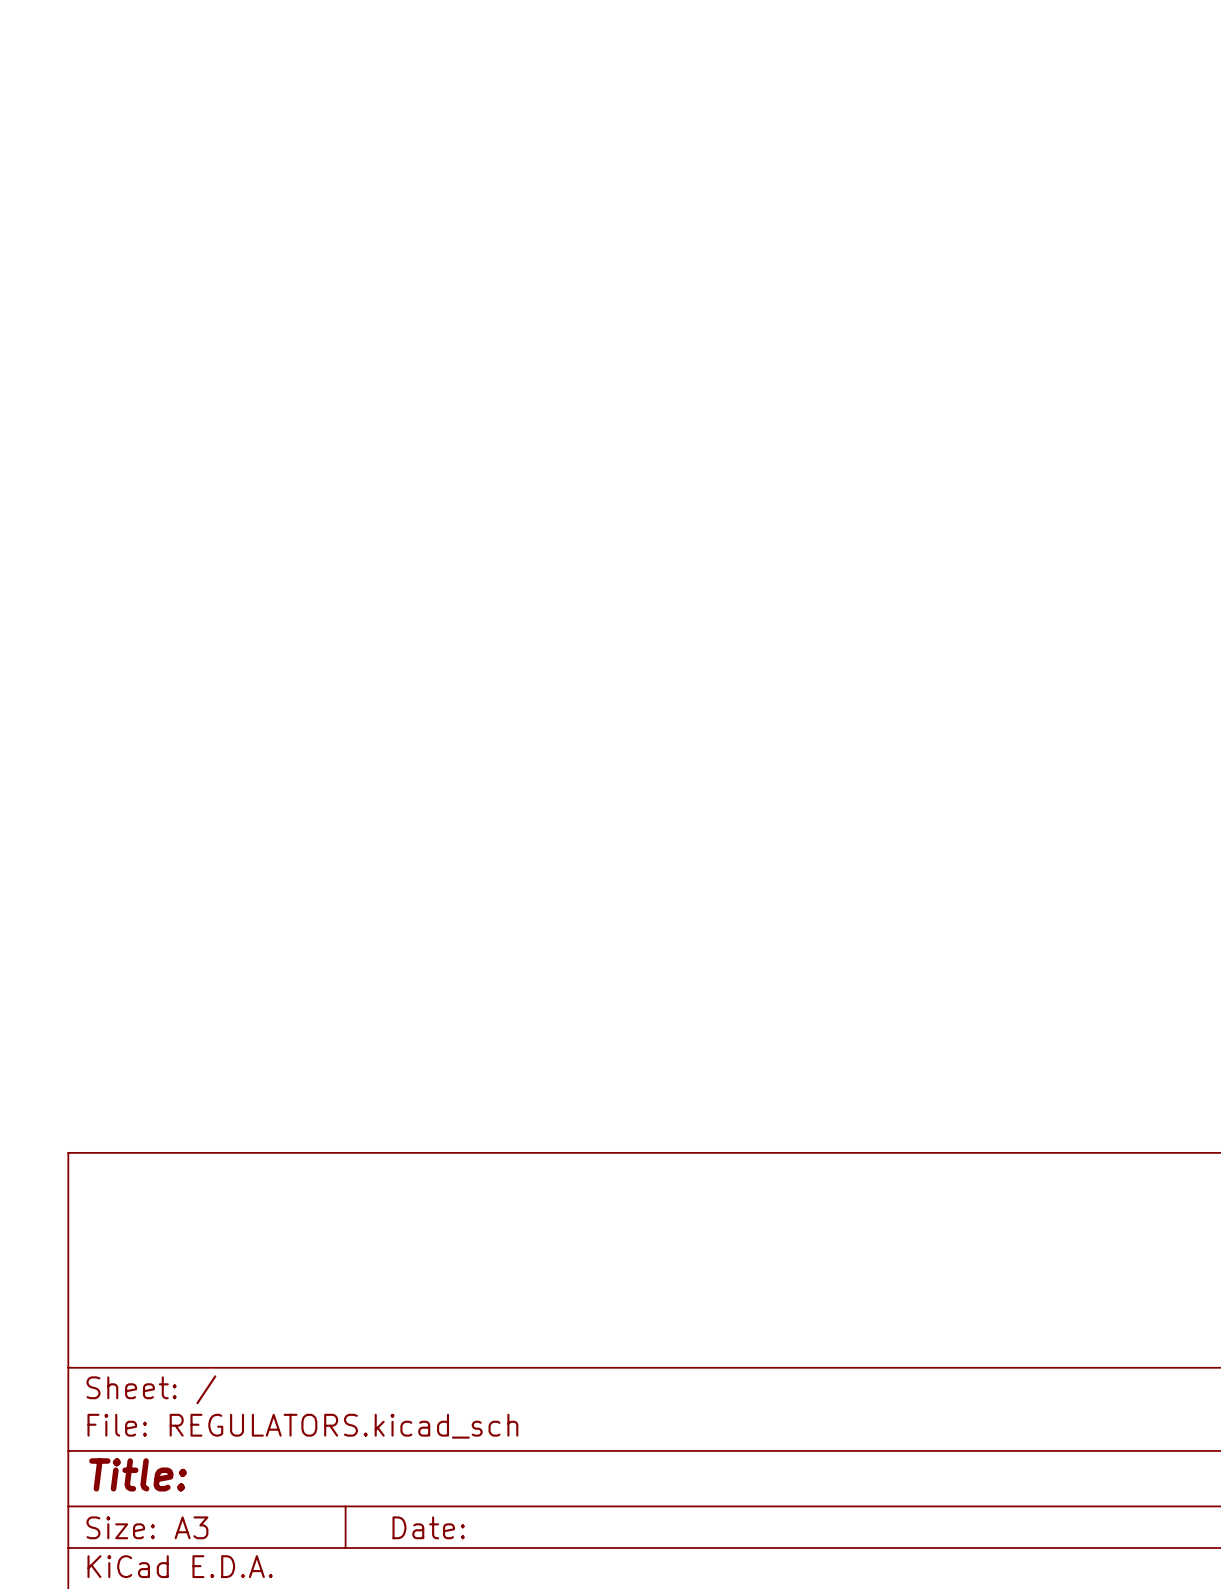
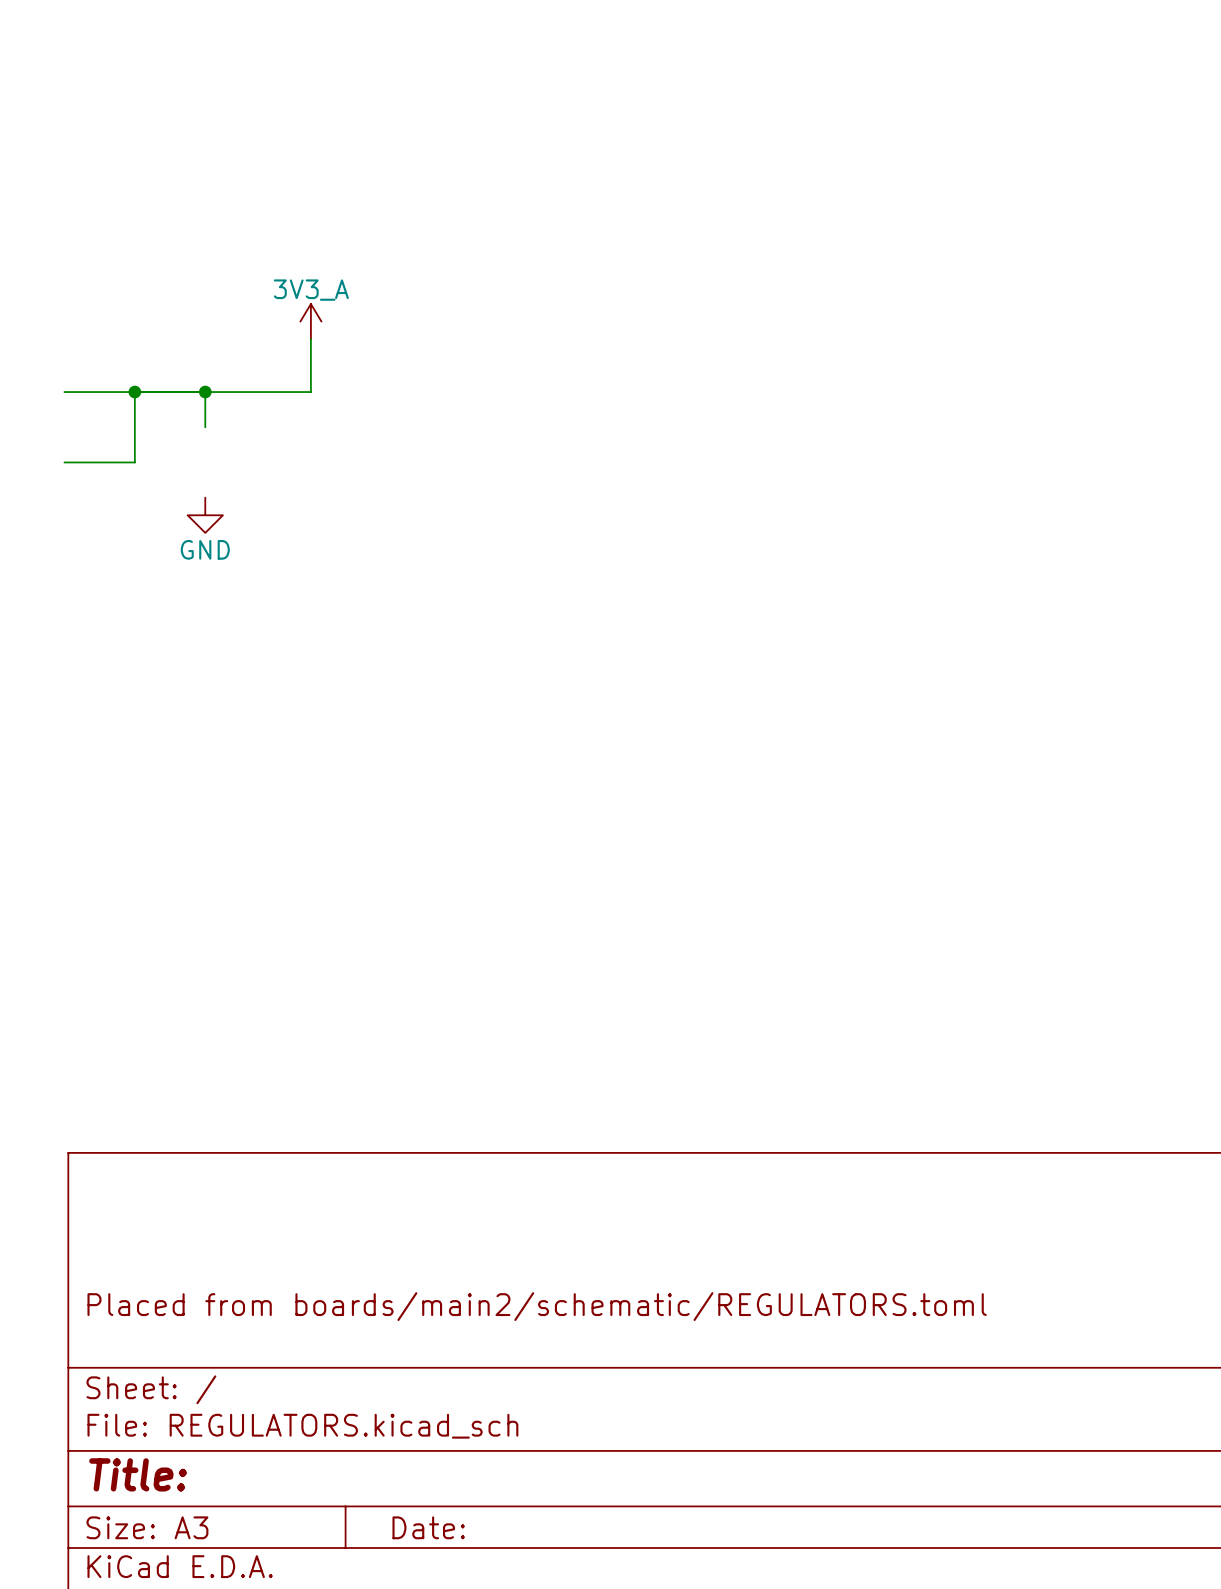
power symbol: none -> 3V3_A (310, 321)
wire: none -> (310, 339) (310, 392) (64, 392)
wire: none -> (134, 392) (134, 462) (64, 462)
junction: none -> (134, 392)
wire: none -> (205, 392) (205, 427)
junction: none -> (205, 392)
power symbol: none -> GND (205, 515)
title block: none -> Placed from boards/main2/schematic/REGULATORS.toml (537, 1306)

